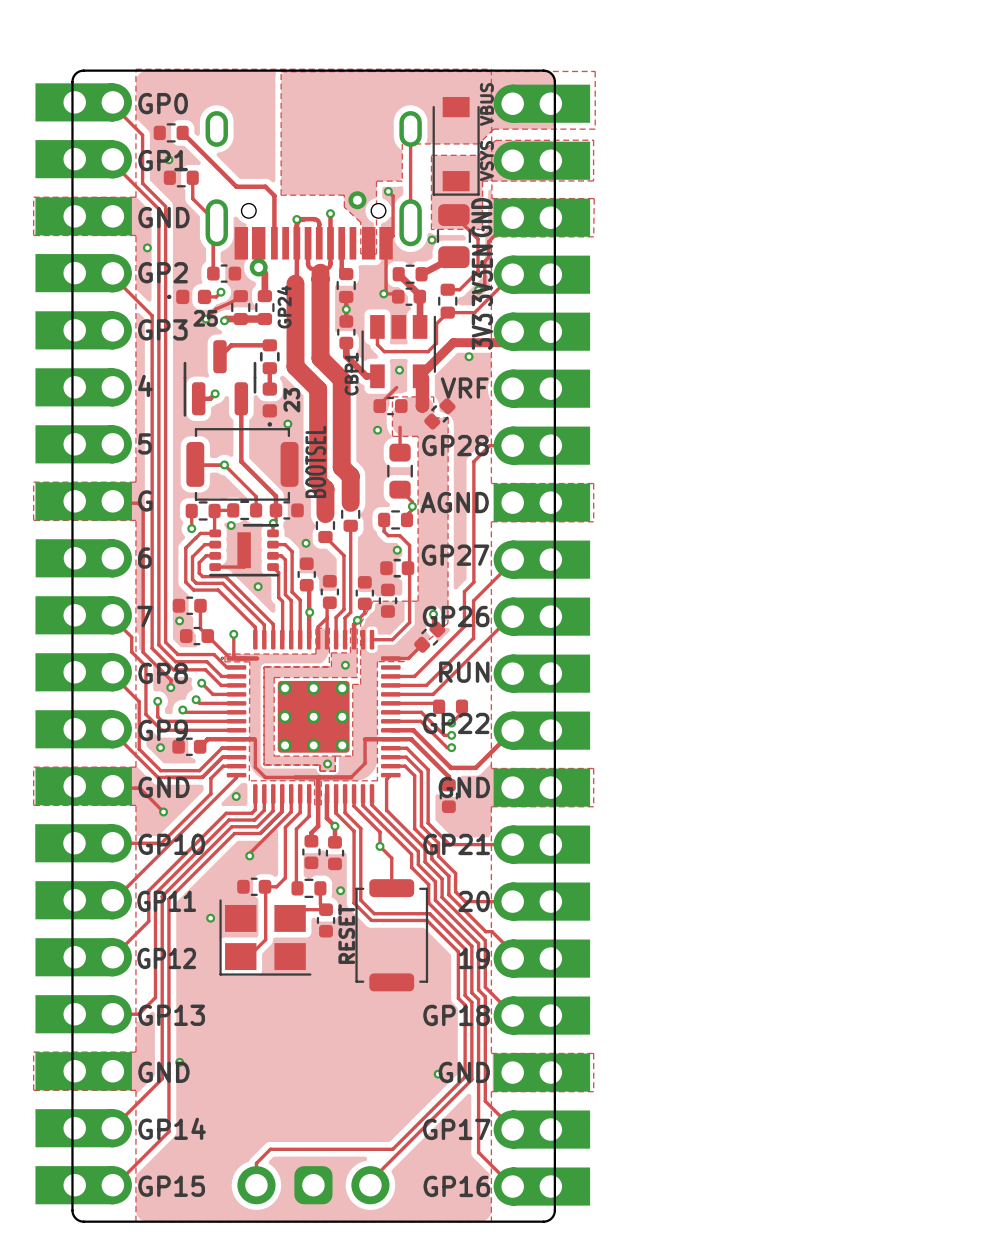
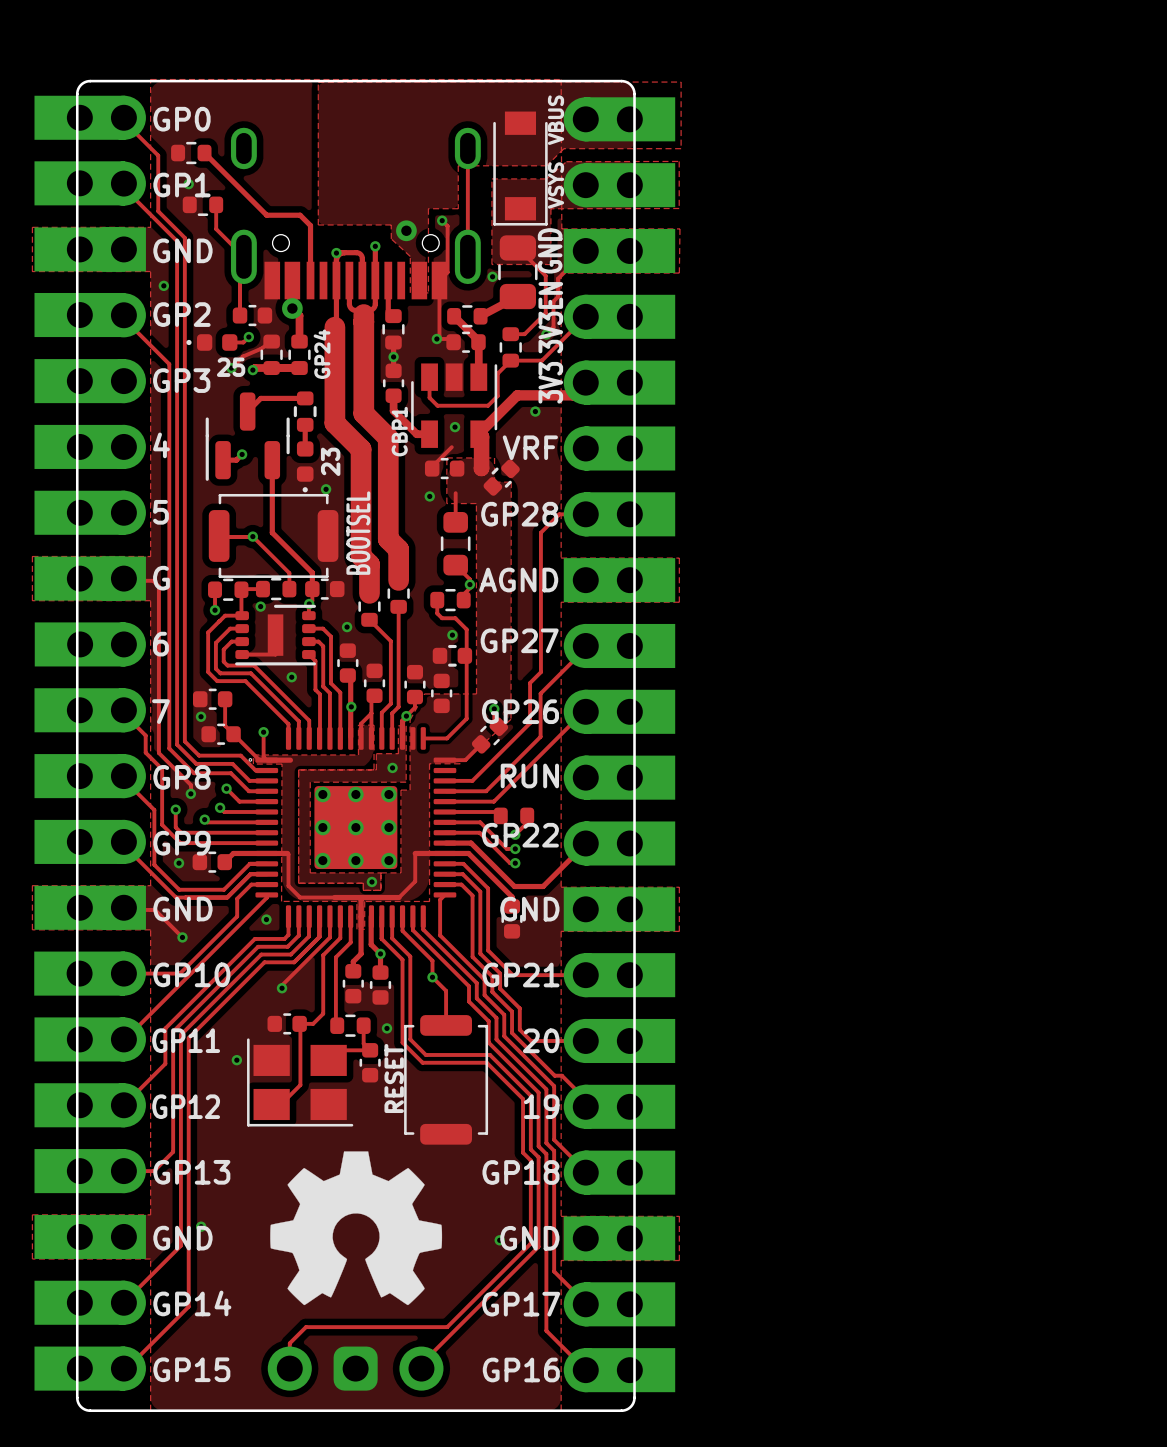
drawing: none -> [270, 1151, 443, 1306]

